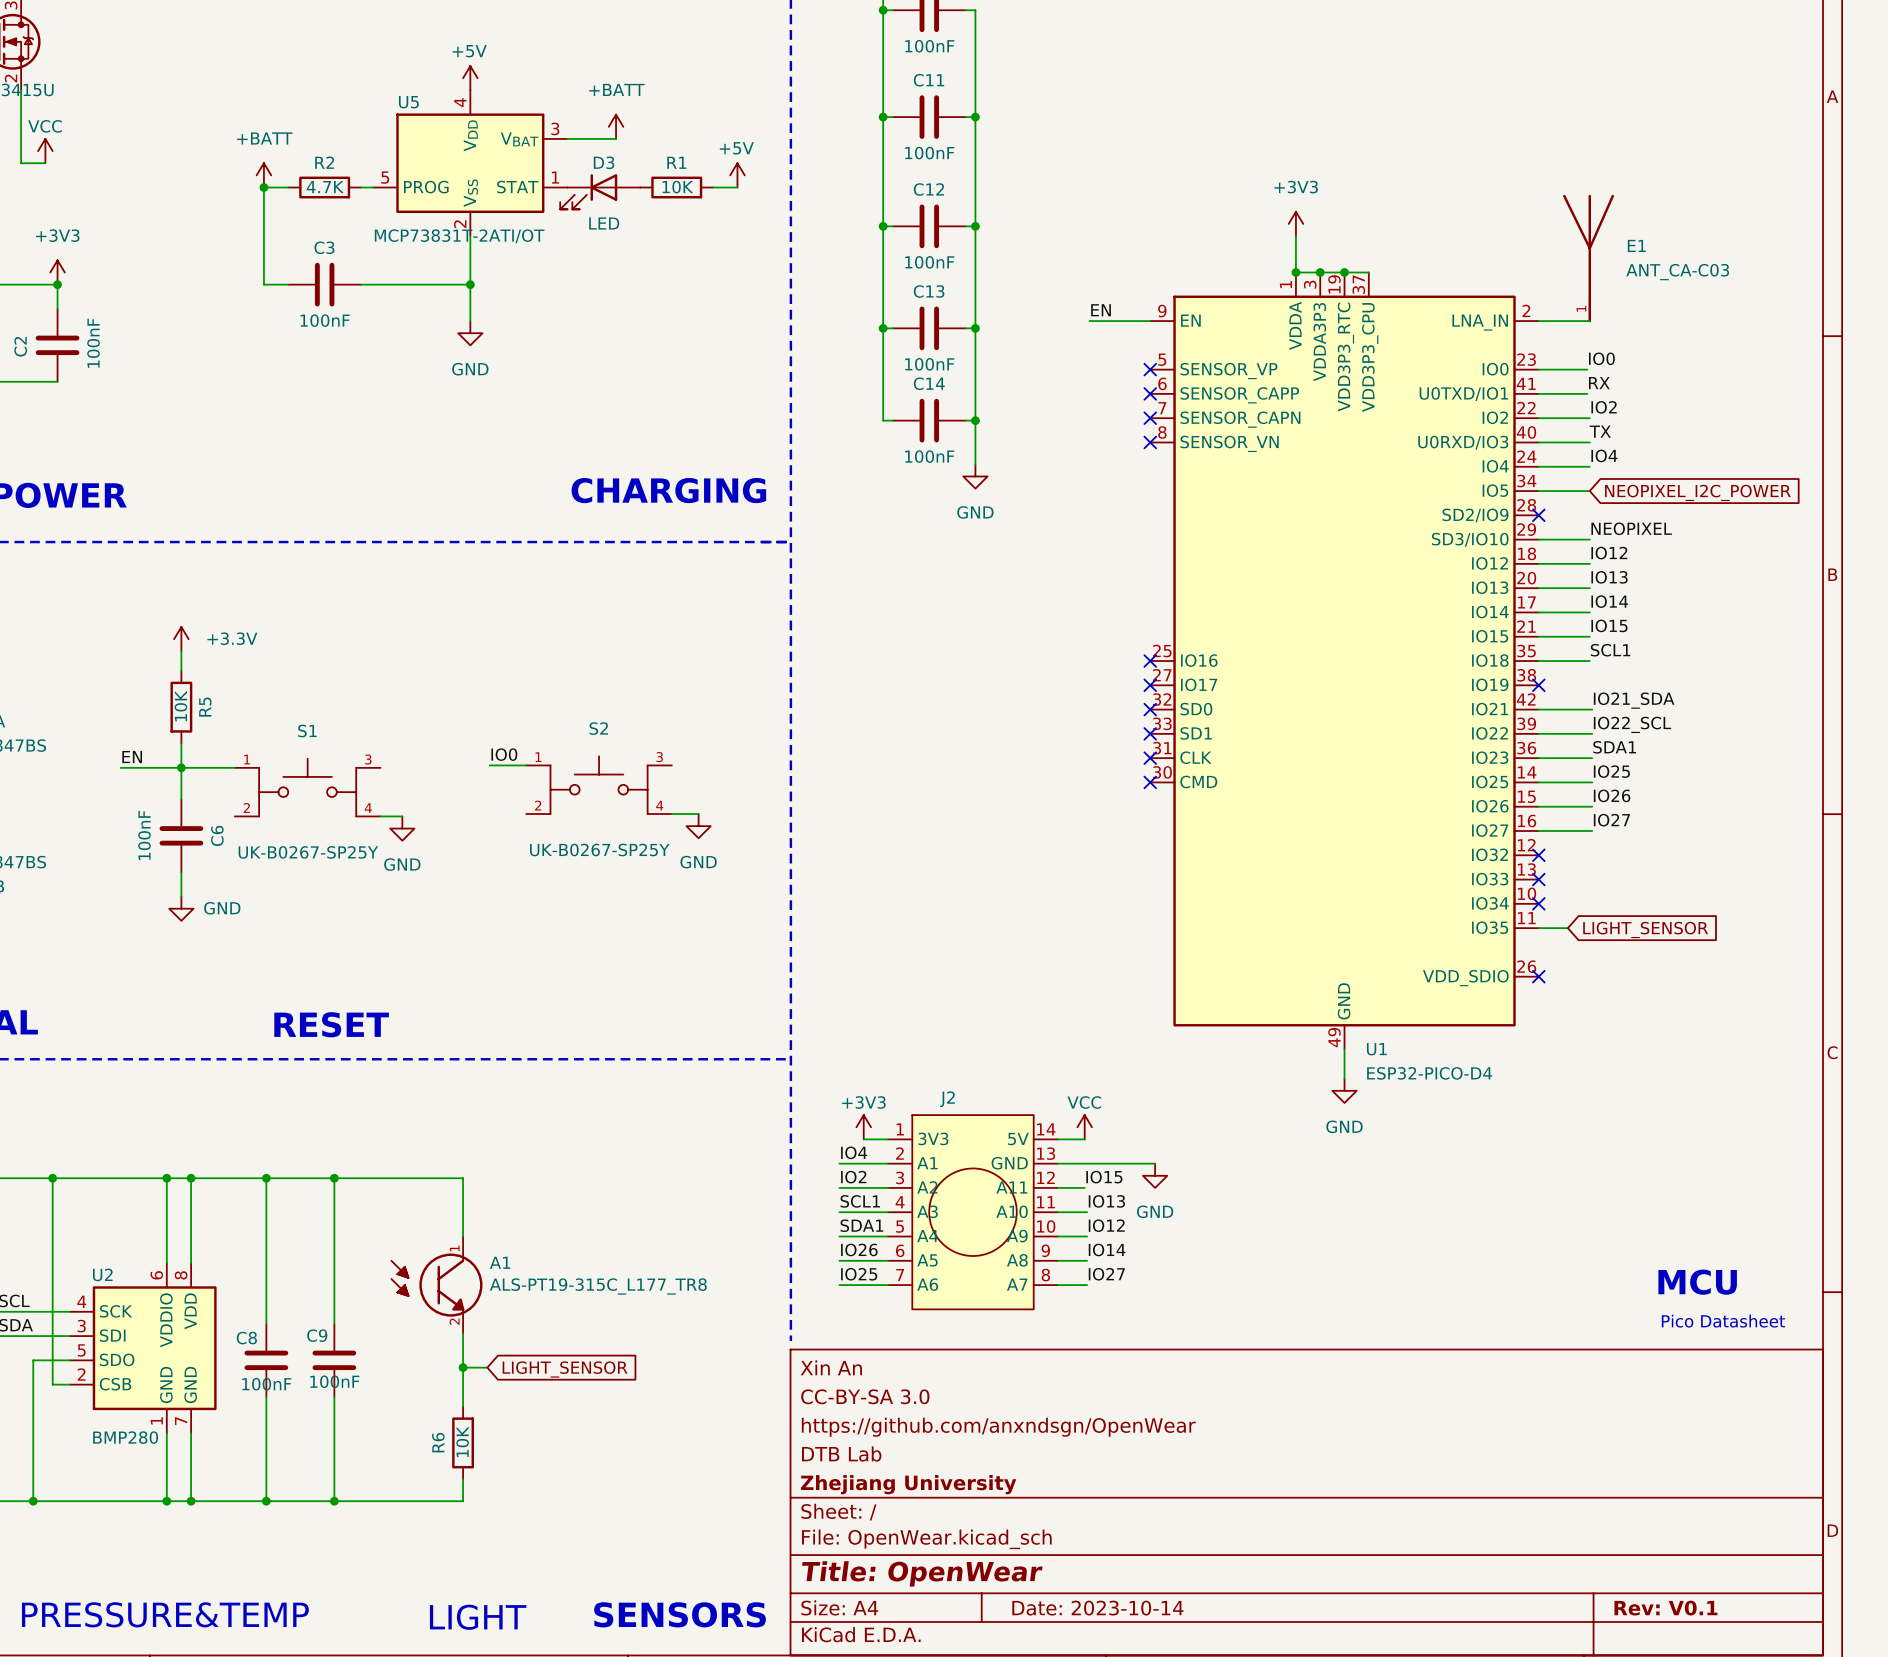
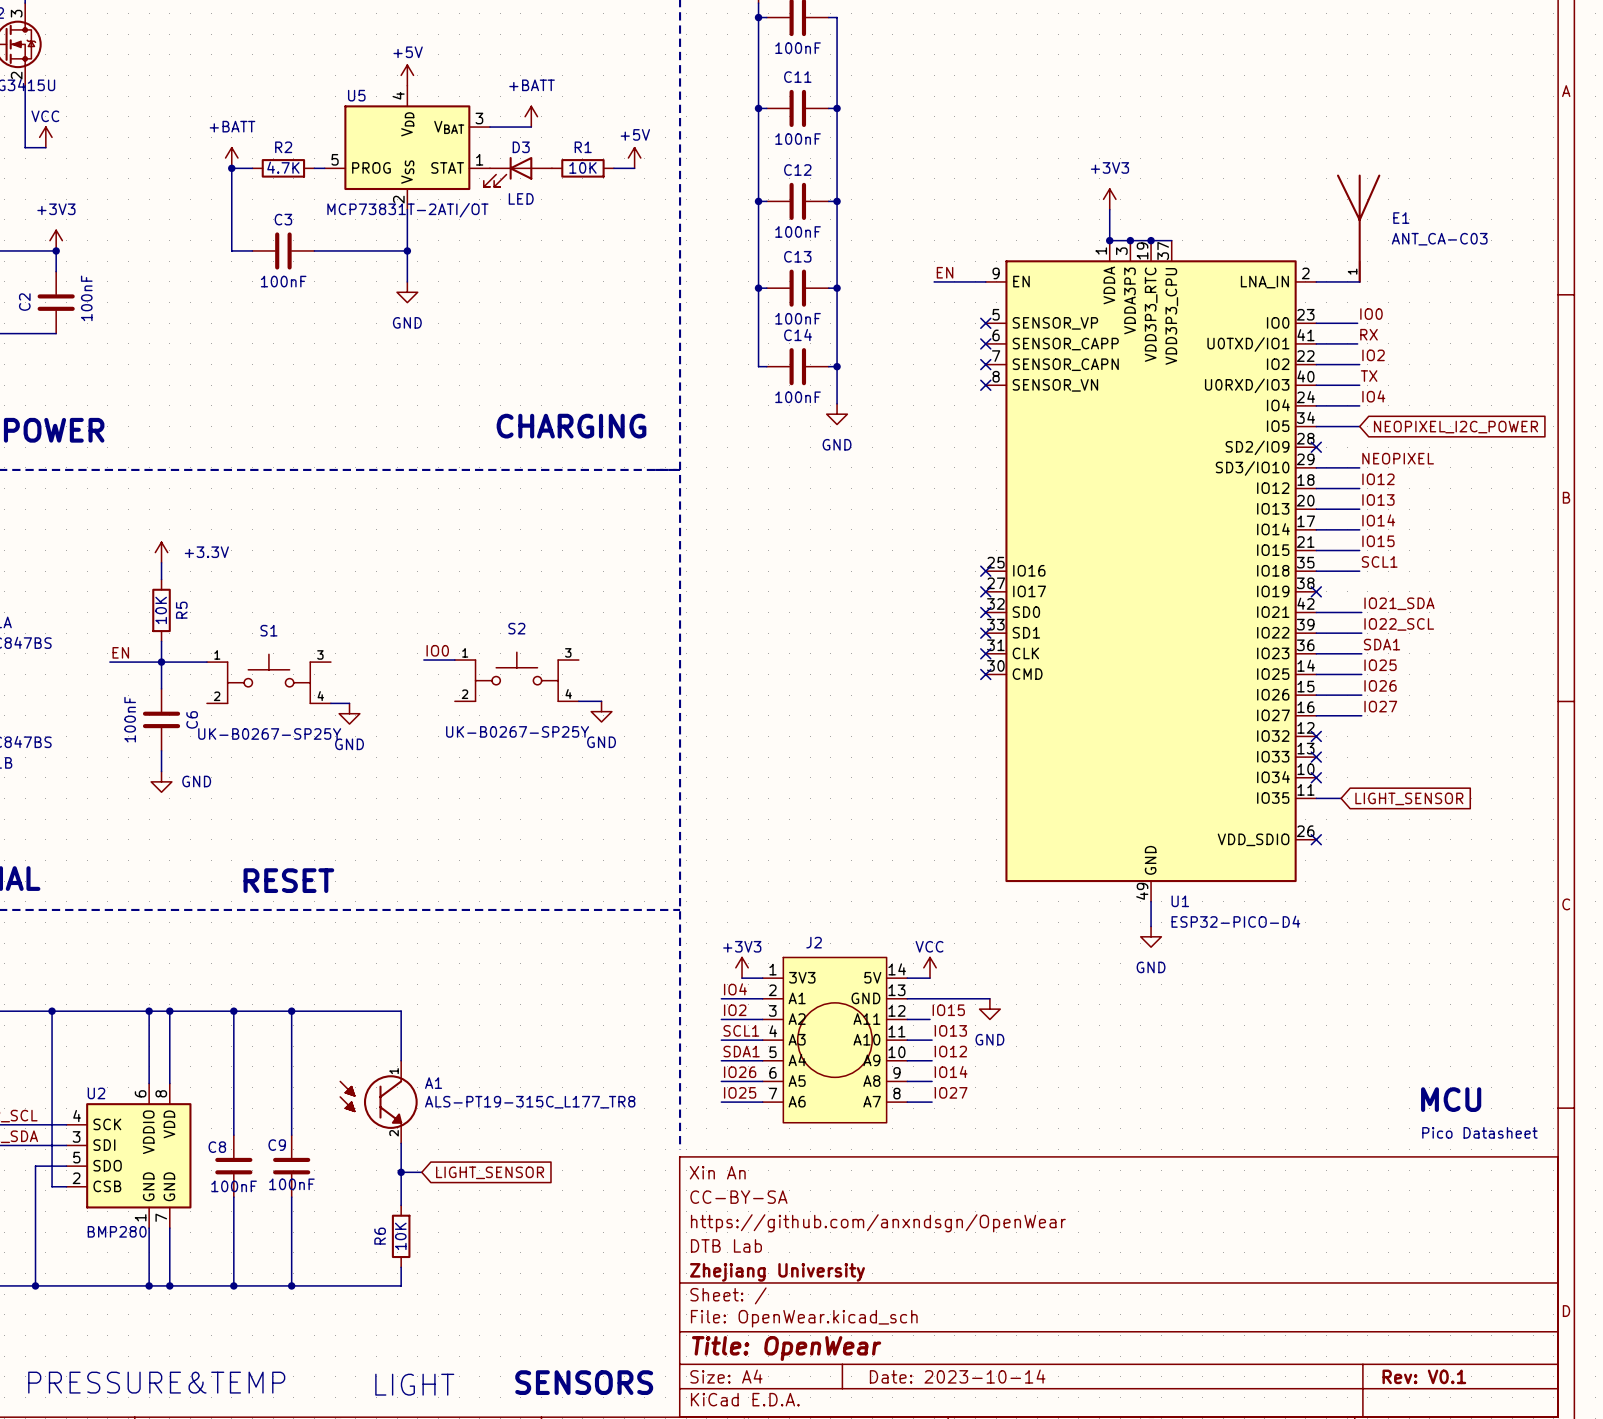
title block: CC-BY-SA 3.0 (865, 1396) -> CC-BY-SA (738, 1197)

